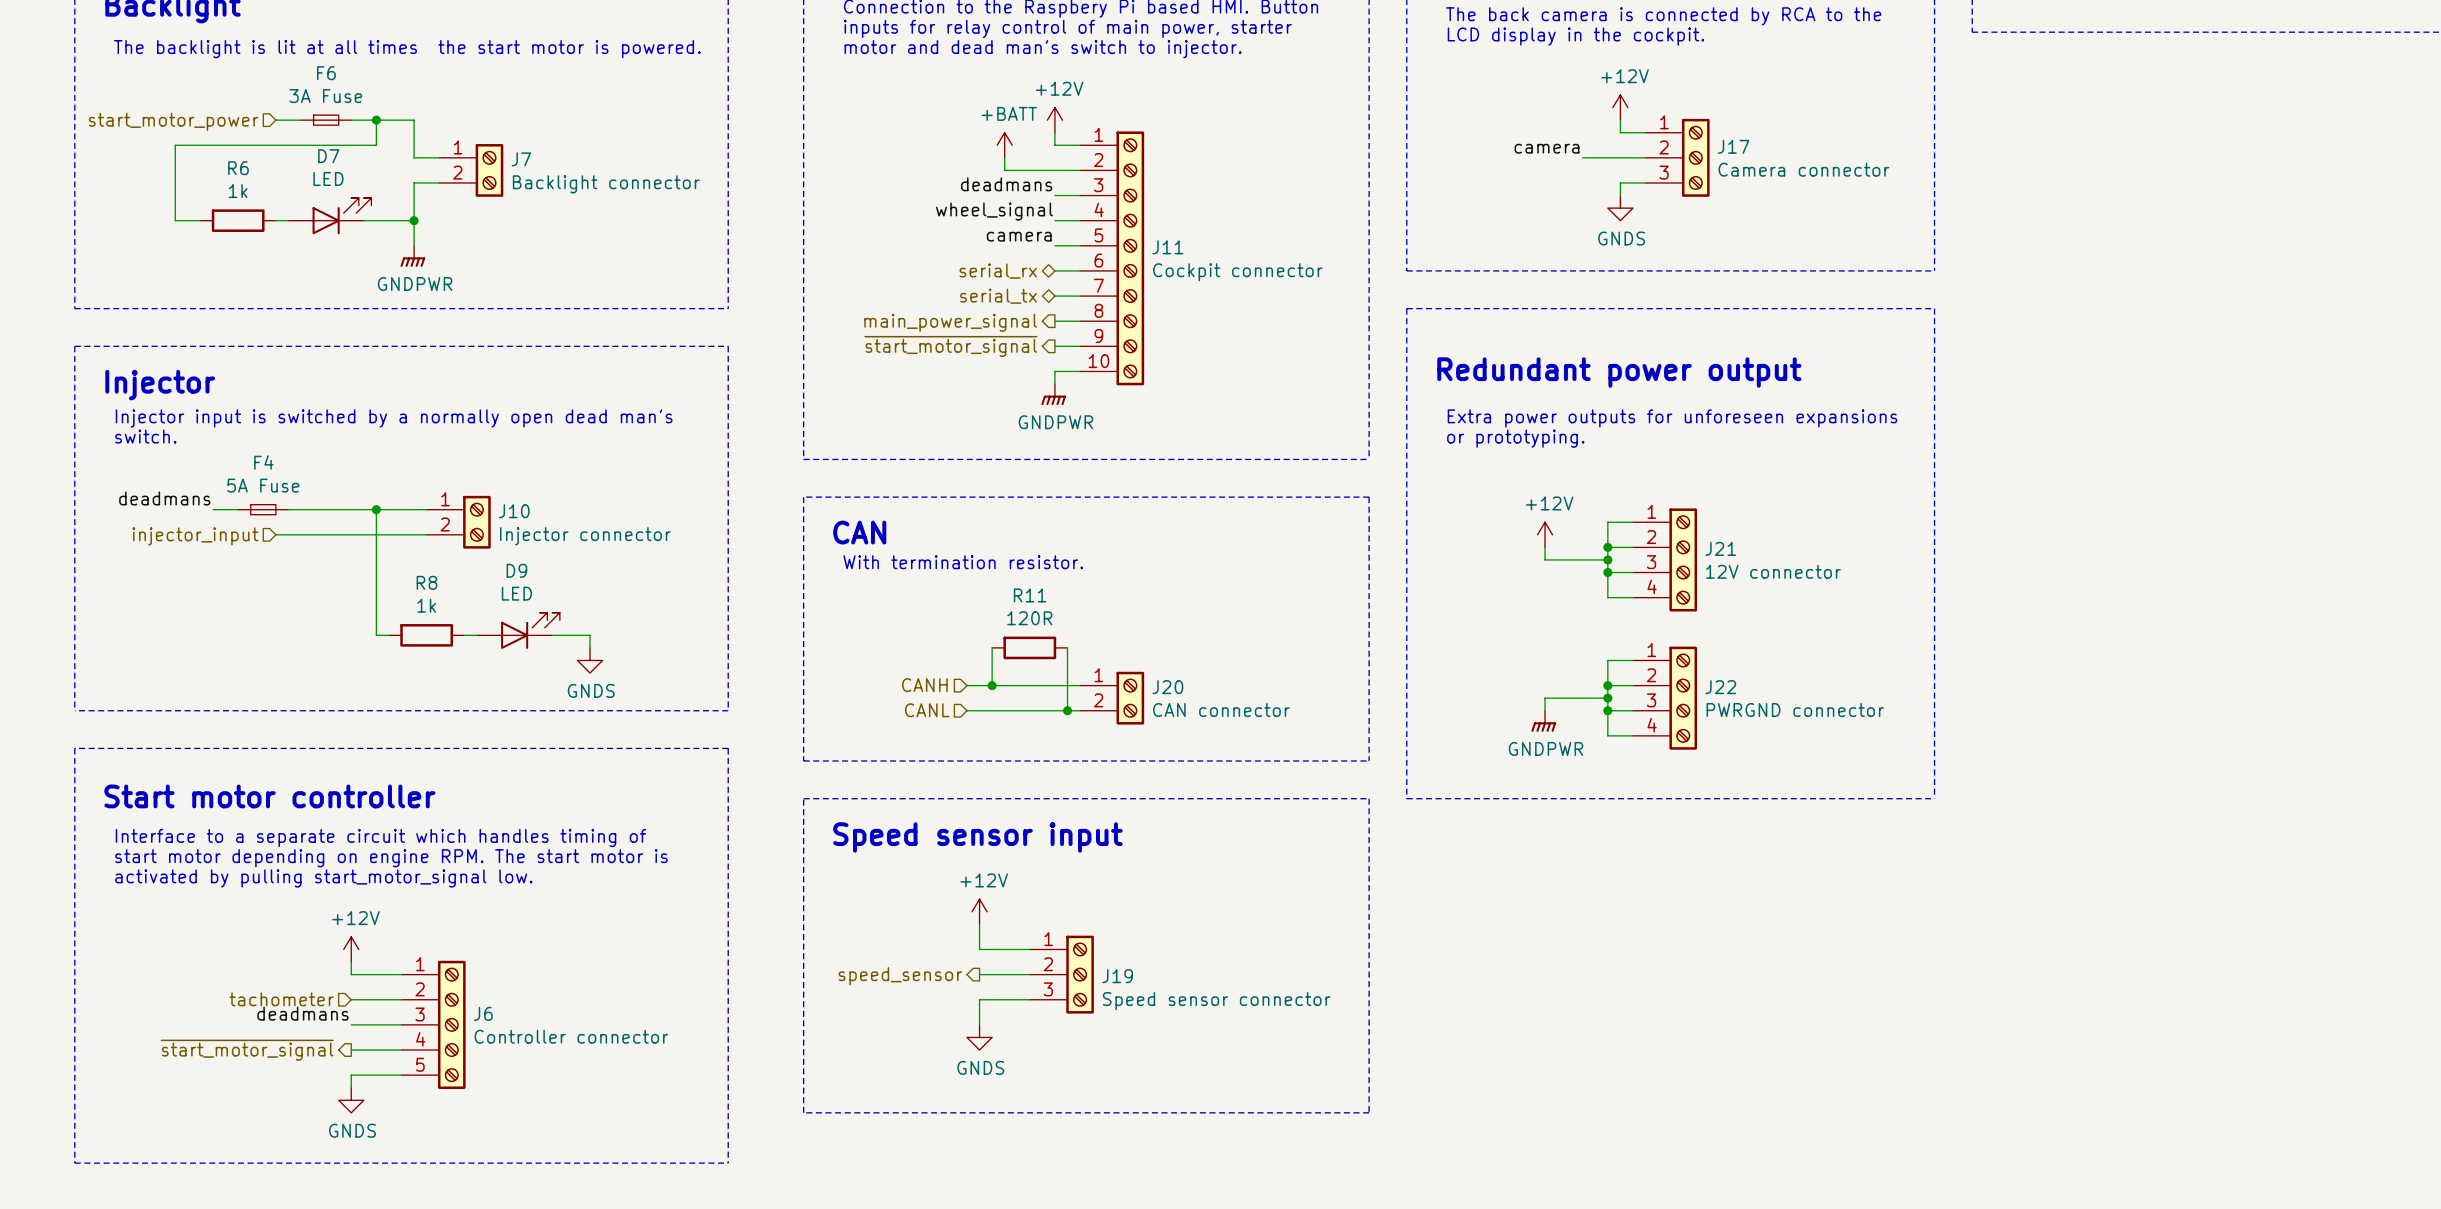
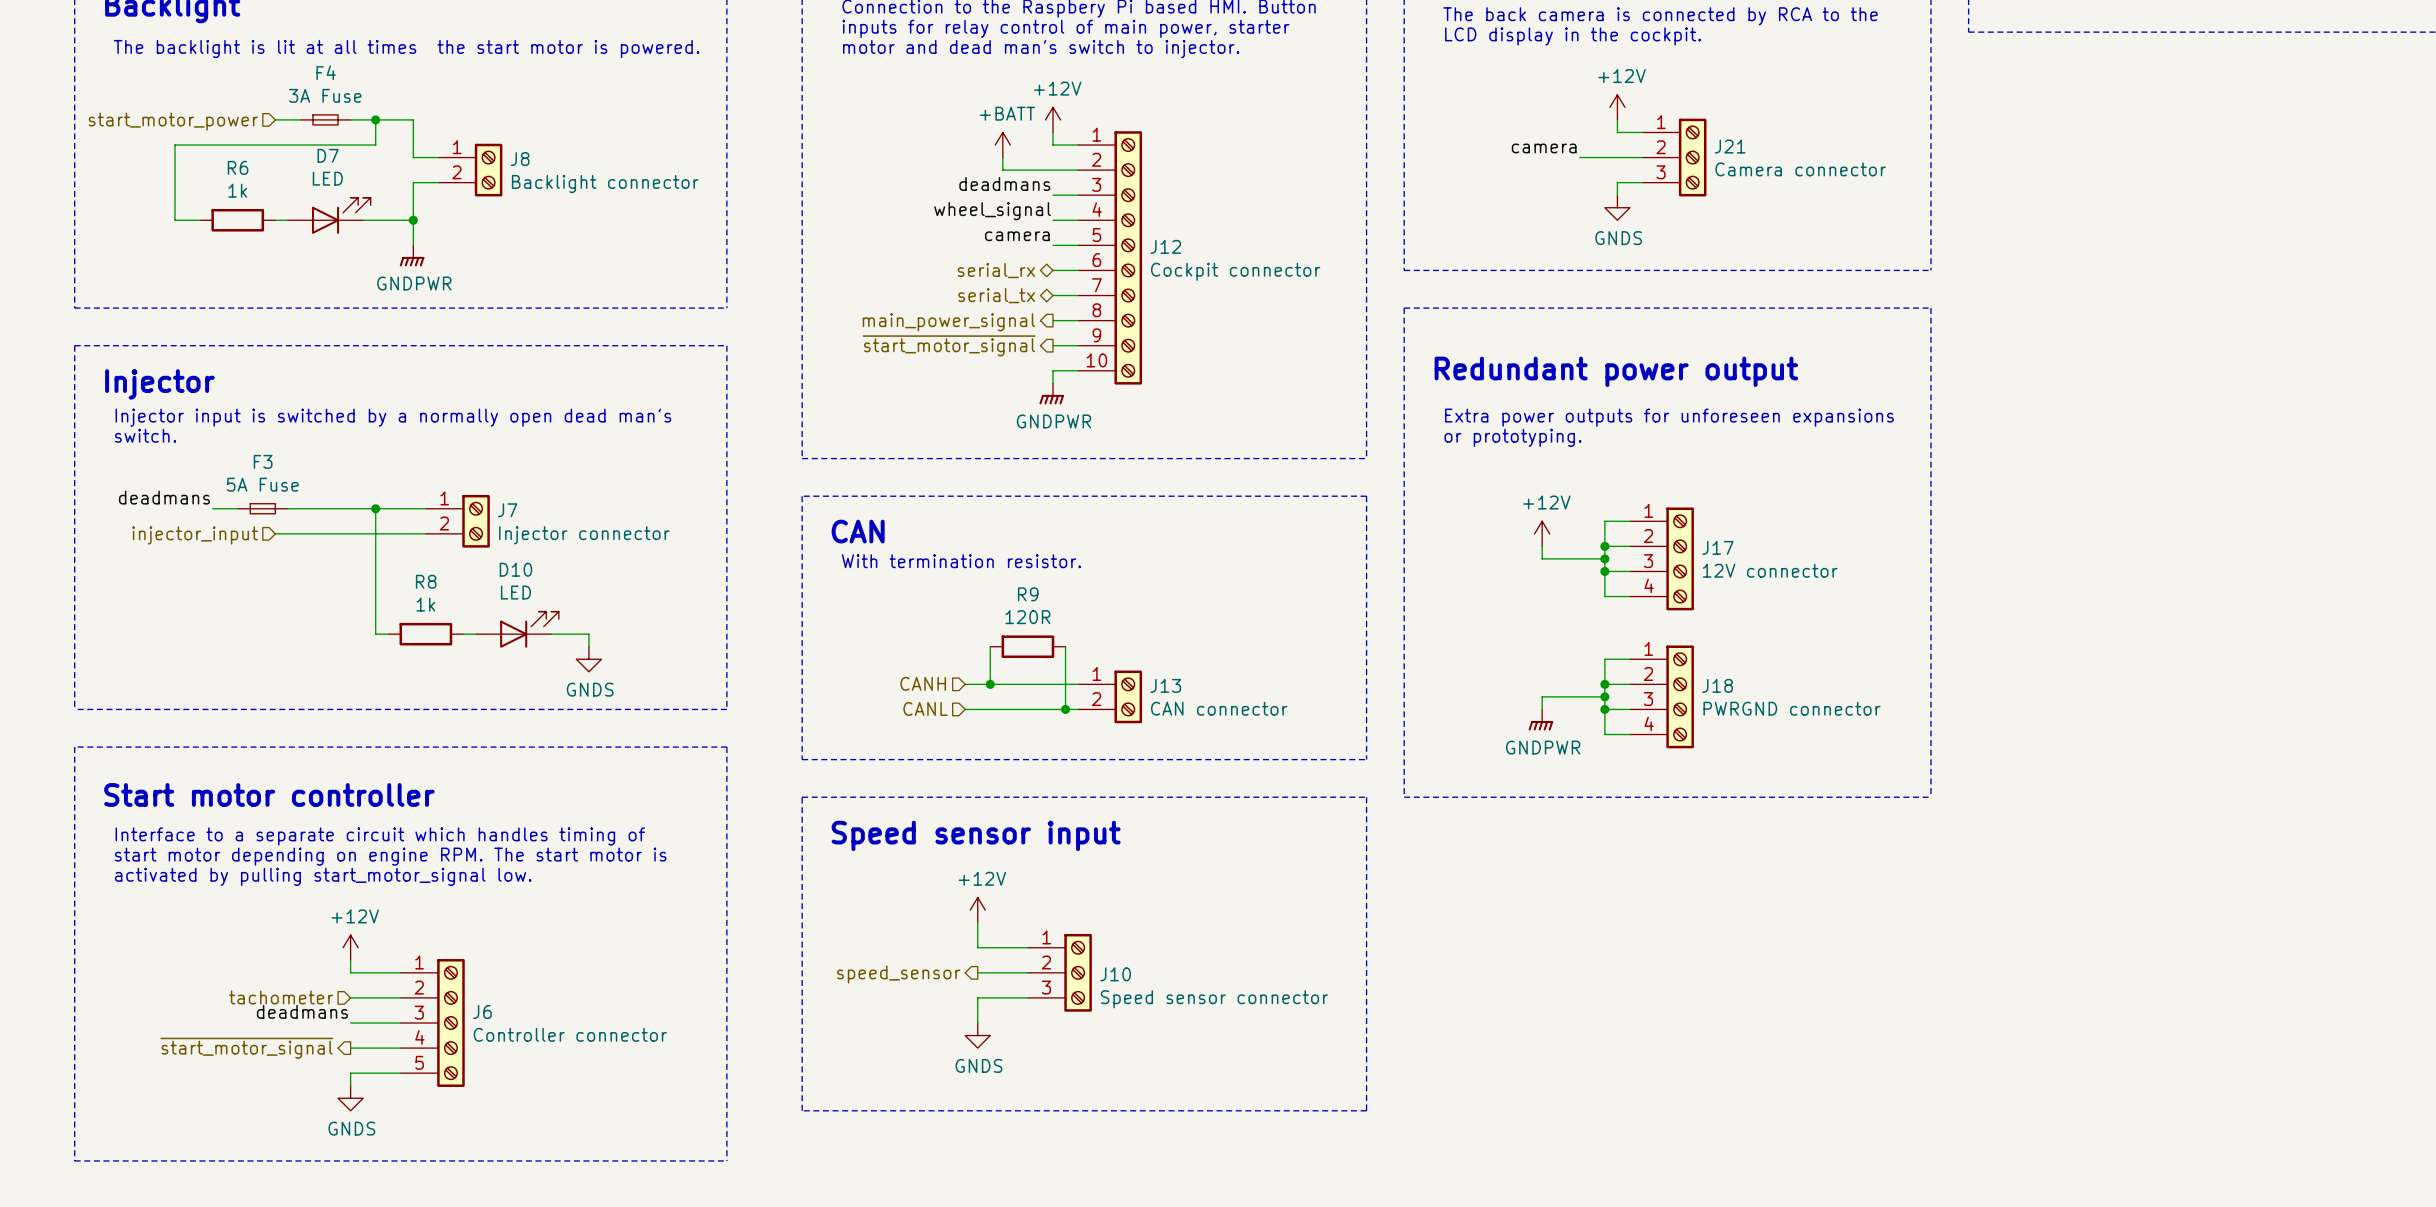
F6 name: F6 (326, 73) -> F4 (326, 72)
J17 name: J17 (1733, 146) -> J21 (1730, 146)
J7 name: J7 (521, 159) -> J8 (520, 159)
J11 name: J11 (1167, 247) -> J12 (1165, 246)
F4 name: F4 (263, 462) -> F3 (263, 461)
J10 name: J10 (514, 511) -> J7 (507, 510)
J21 name: J21 (1720, 548) -> J17 (1717, 547)
D9 name: D9 (516, 570) -> D10 (515, 569)
R11 name: R11 (1030, 595) -> R9 (1028, 594)
J20 name: J20 (1167, 687) -> J13 (1165, 685)
J22 name: J22 (1720, 687) -> J18 (1717, 685)
J19 name: J19 (1117, 976) -> J10 (1115, 974)

